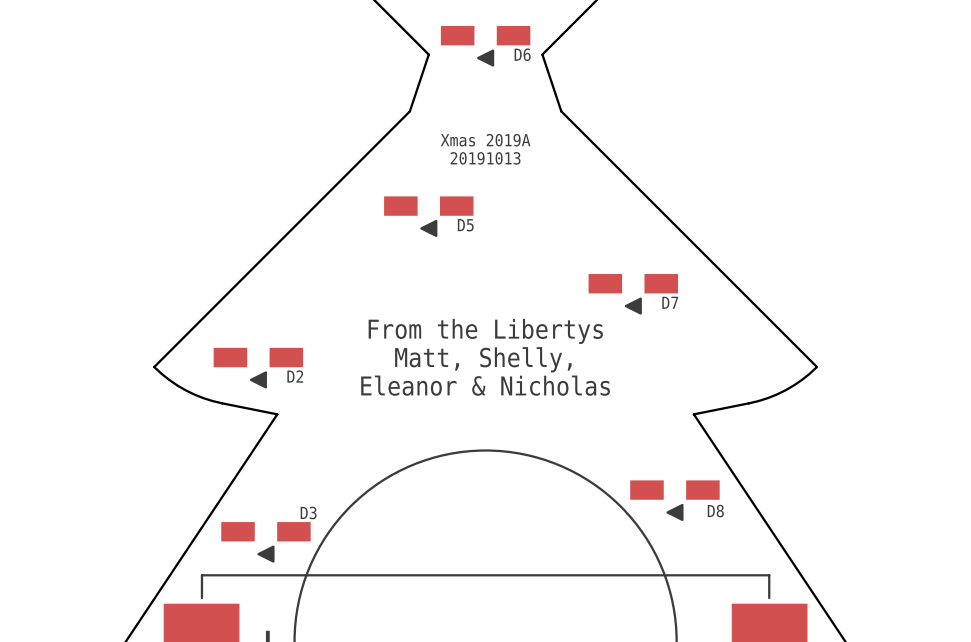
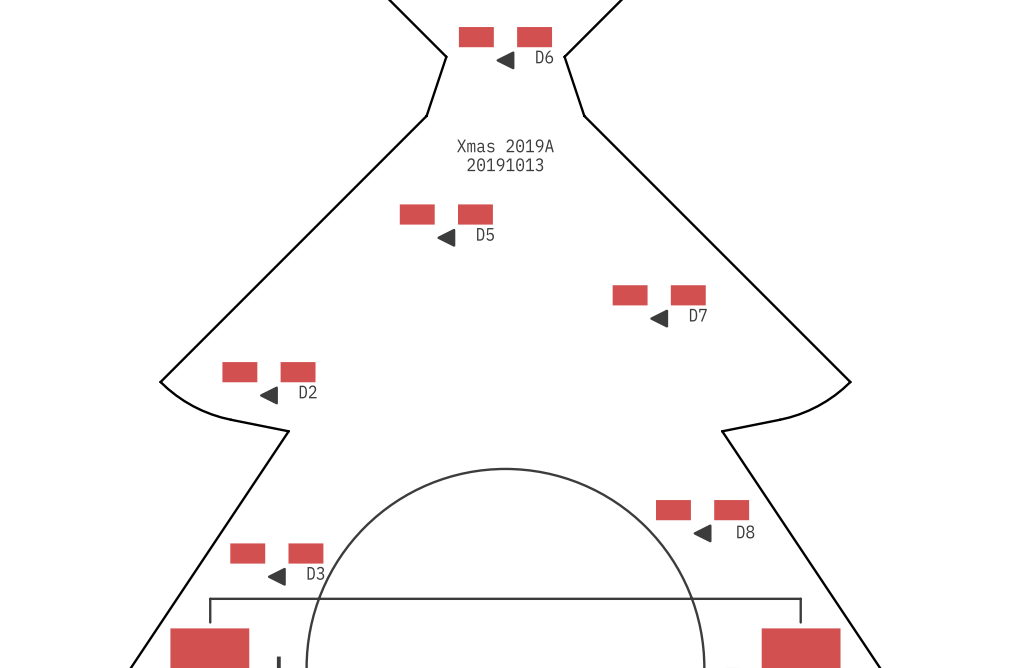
text: From the Libertys (485, 331) -> none
text: Matt, Shelly, (483, 359) -> none
text: Eleanor & Nicholas (485, 385) -> none
D3 name position: D3 (308, 512) -> D3 (315, 573)

